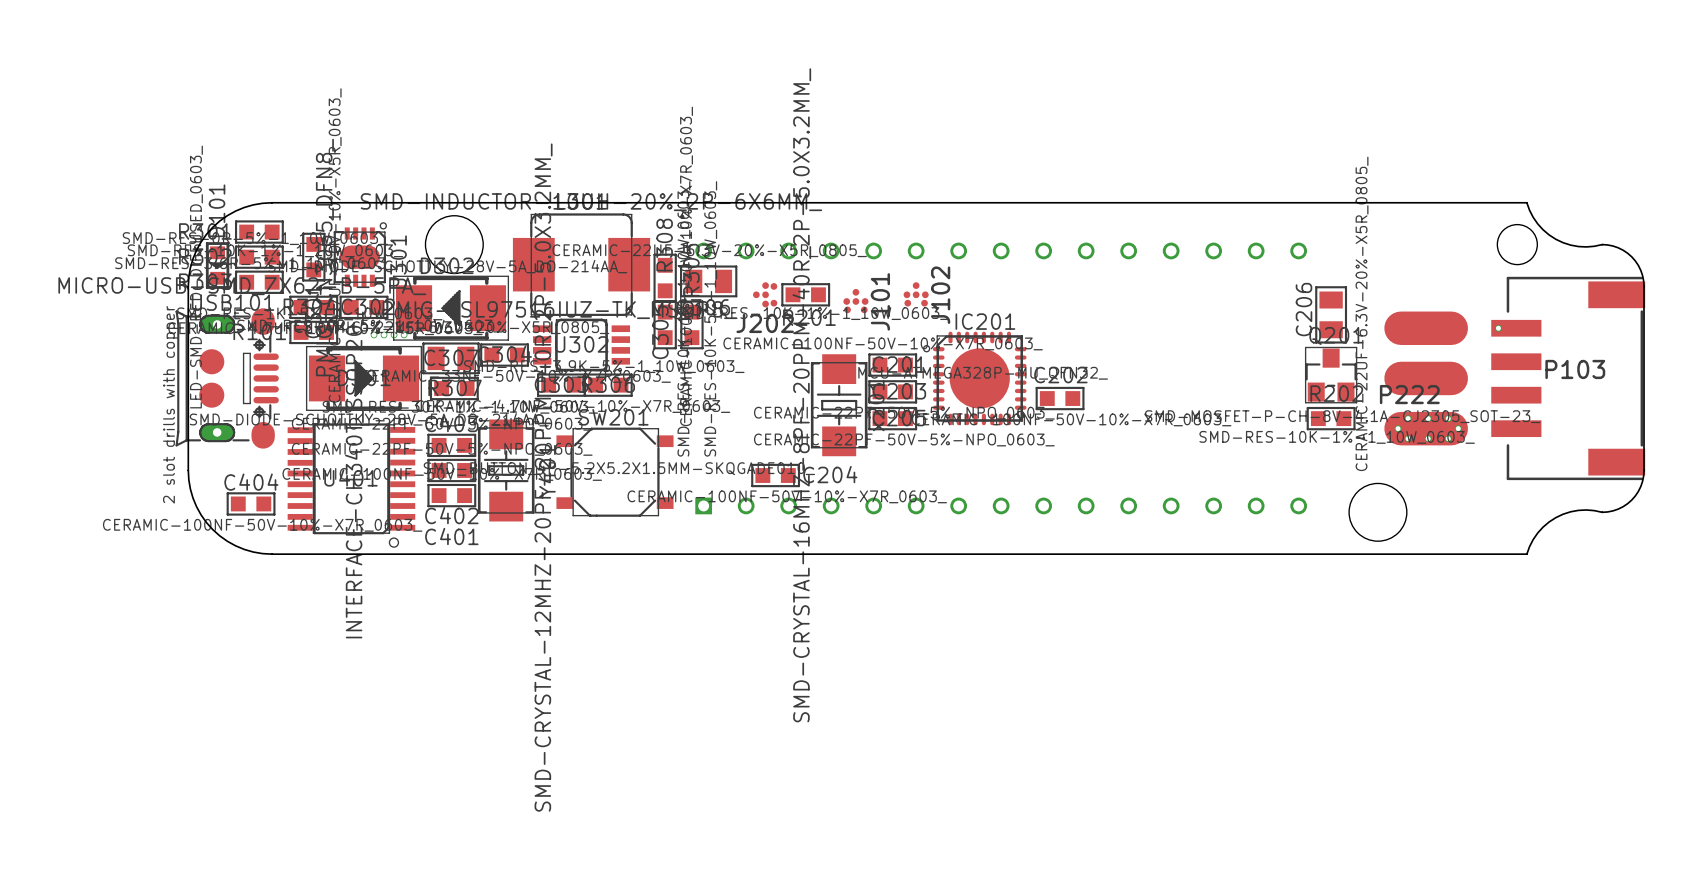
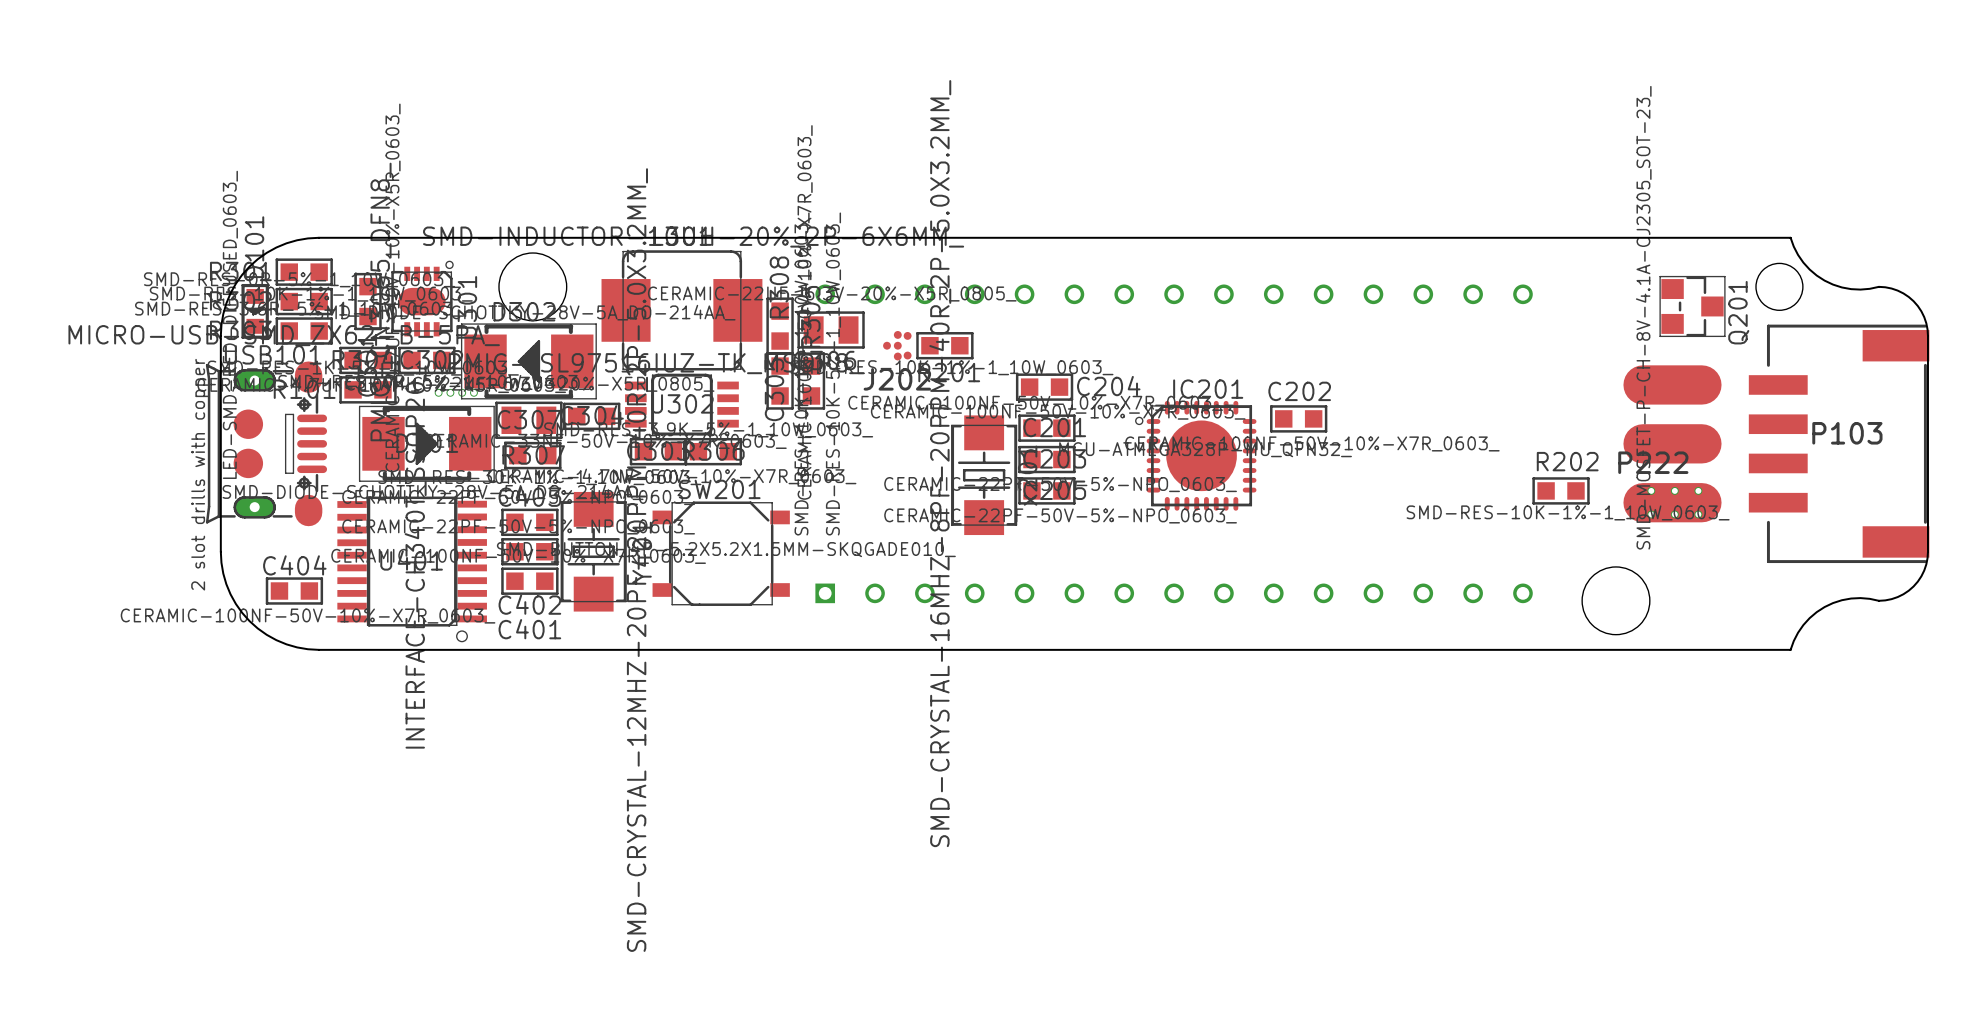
J102: (916, 294) -> none
J101: (855, 301) -> none
C206: CERAMIC-22UF-6.3V-20%-X5R_0805_ (1331, 314) -> none
part: (1498, 328) -> none
Q201 rotation: 0° (1331, 375) -> 90° clockwise (1692, 306)
Q201 position: (1331, 375) -> (1692, 306)
IC201 position: (975, 378) -> (1196, 455)
C202 position: (1060, 398) -> (1298, 418)
part: (1398, 428) -> none
part: (1458, 428) -> none
C204 position: (775, 475) -> (1044, 387)

